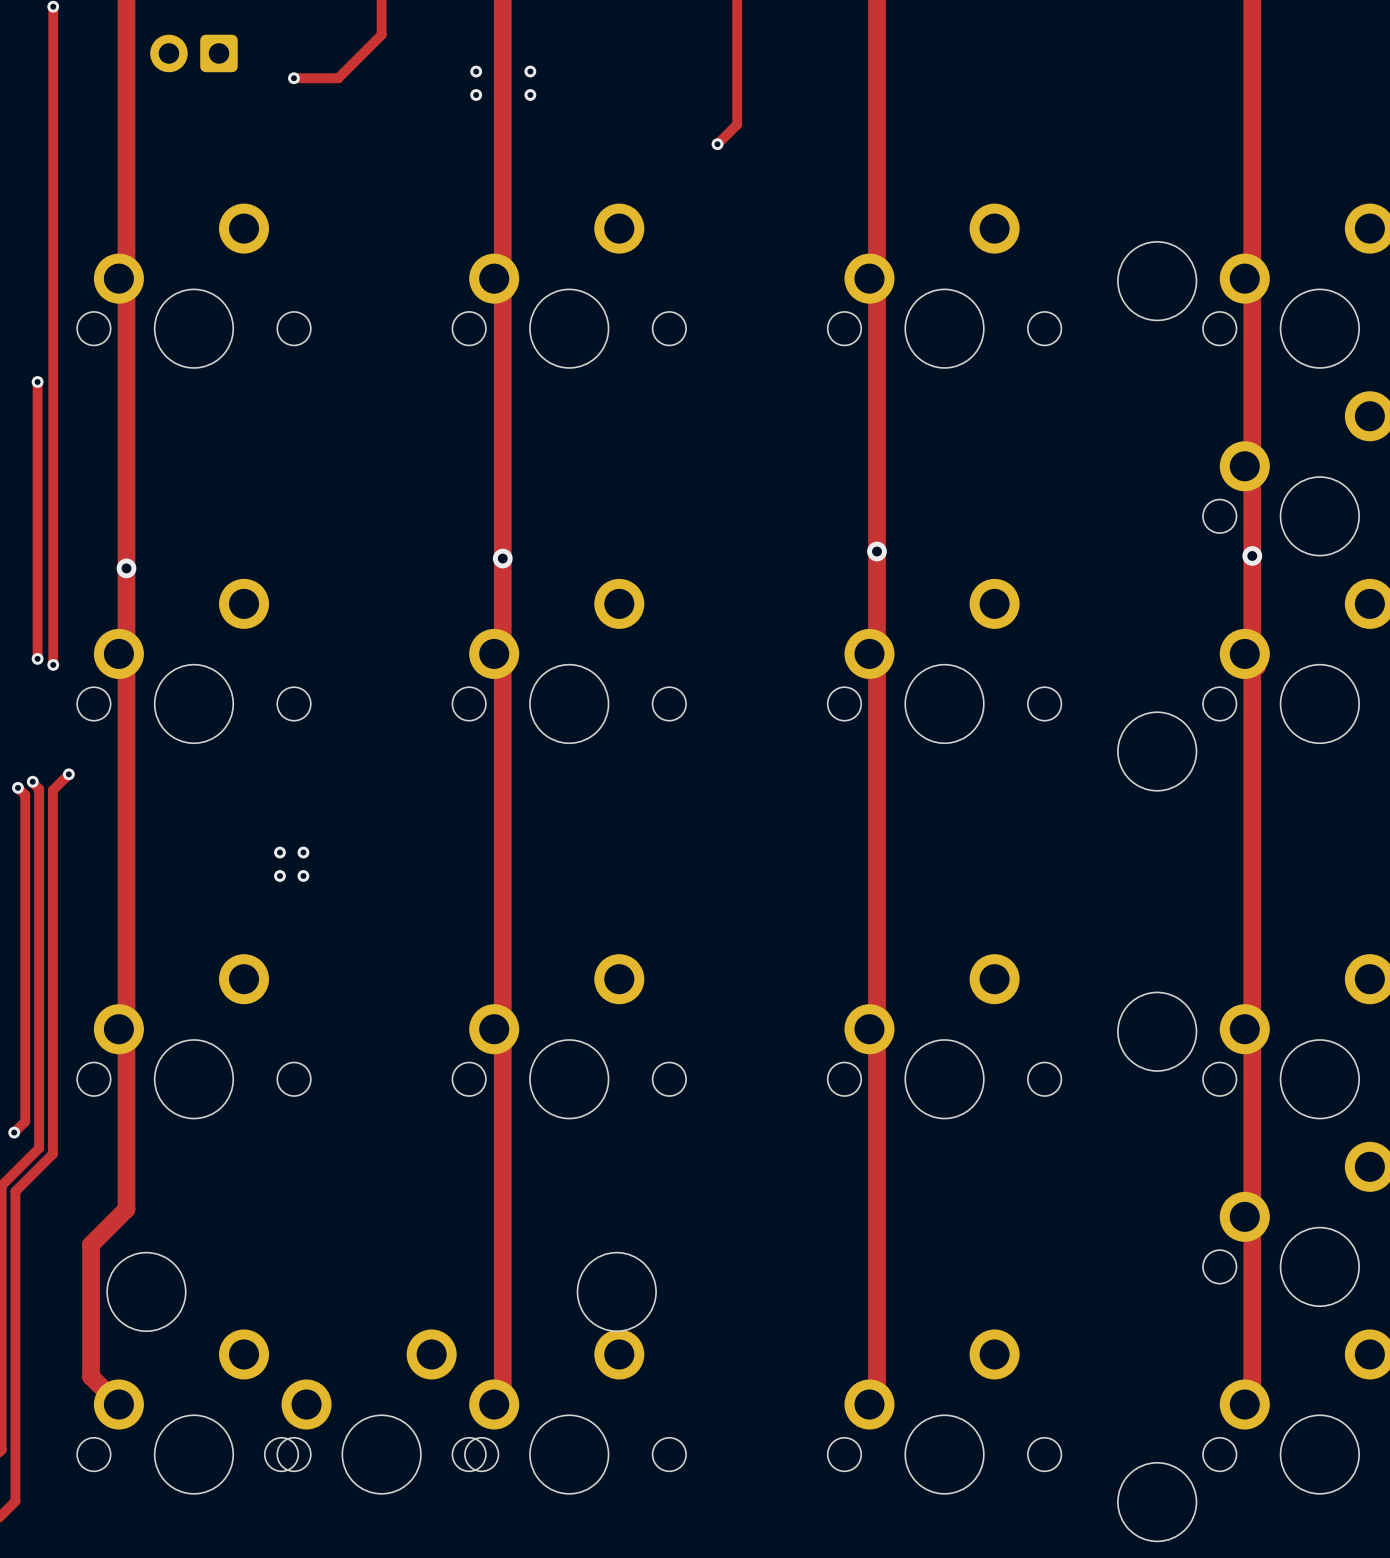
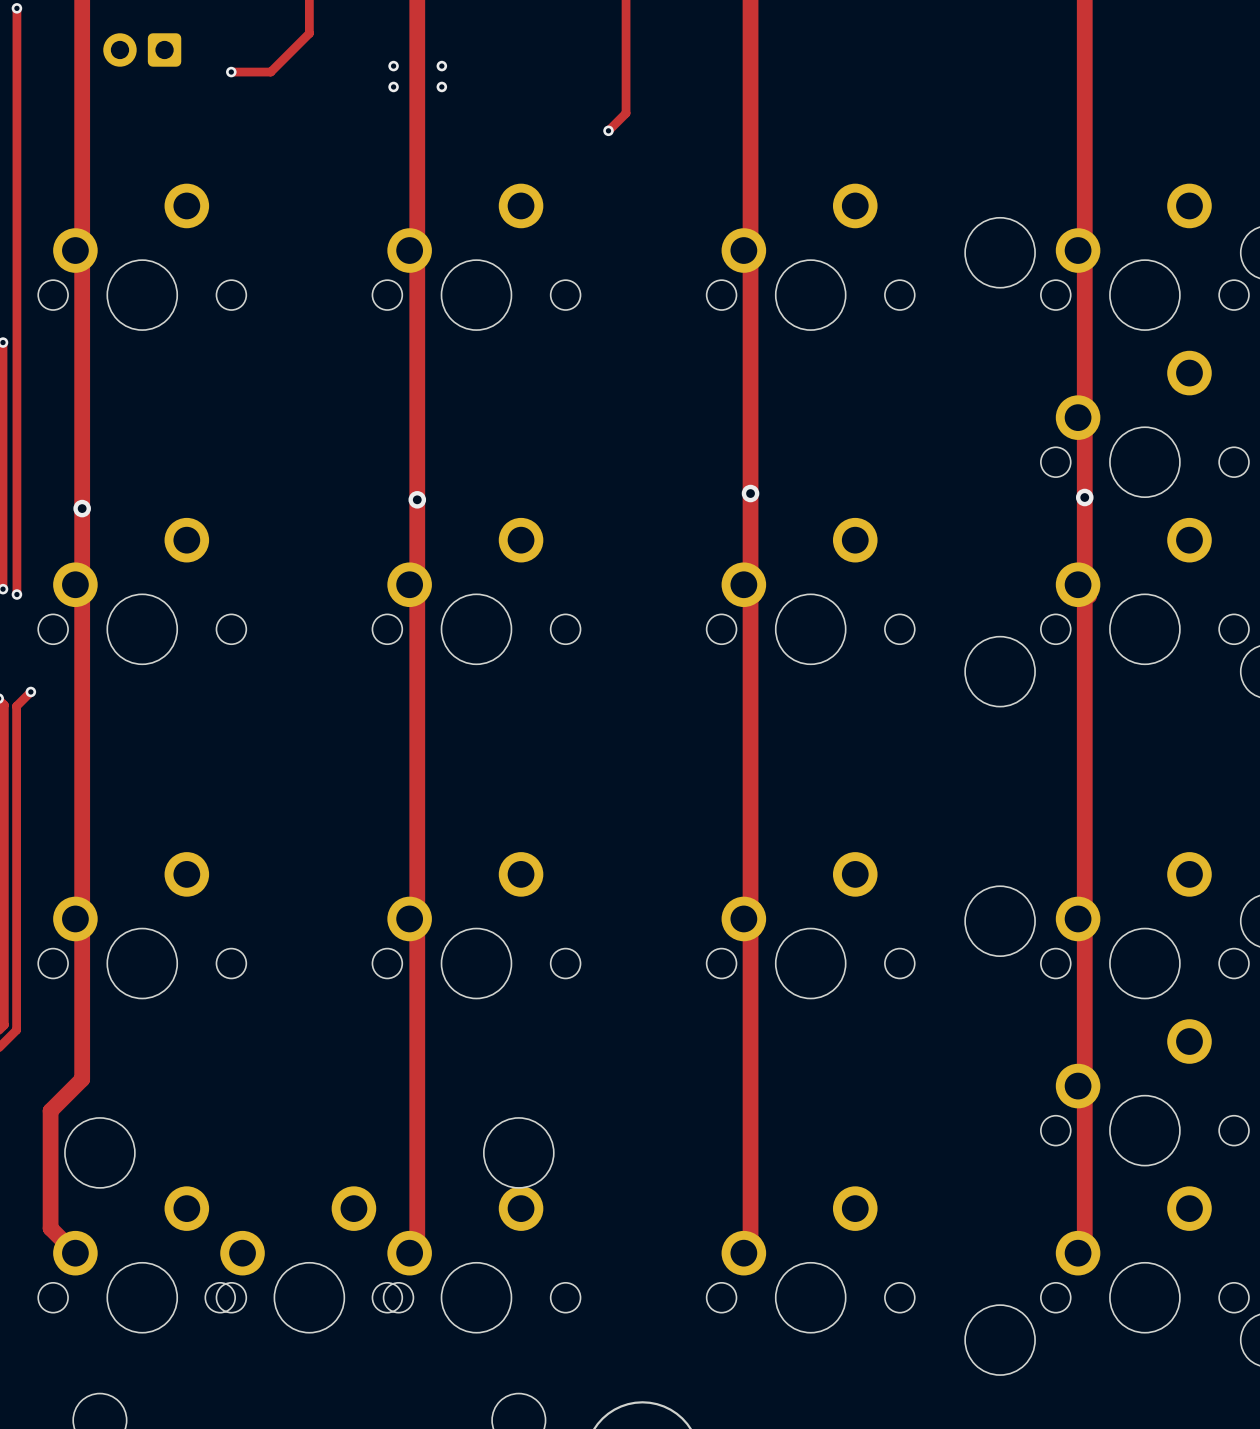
via: (279, 852) -> none
via: (303, 852) -> none
via: (279, 875) -> none
via: (303, 875) -> none

